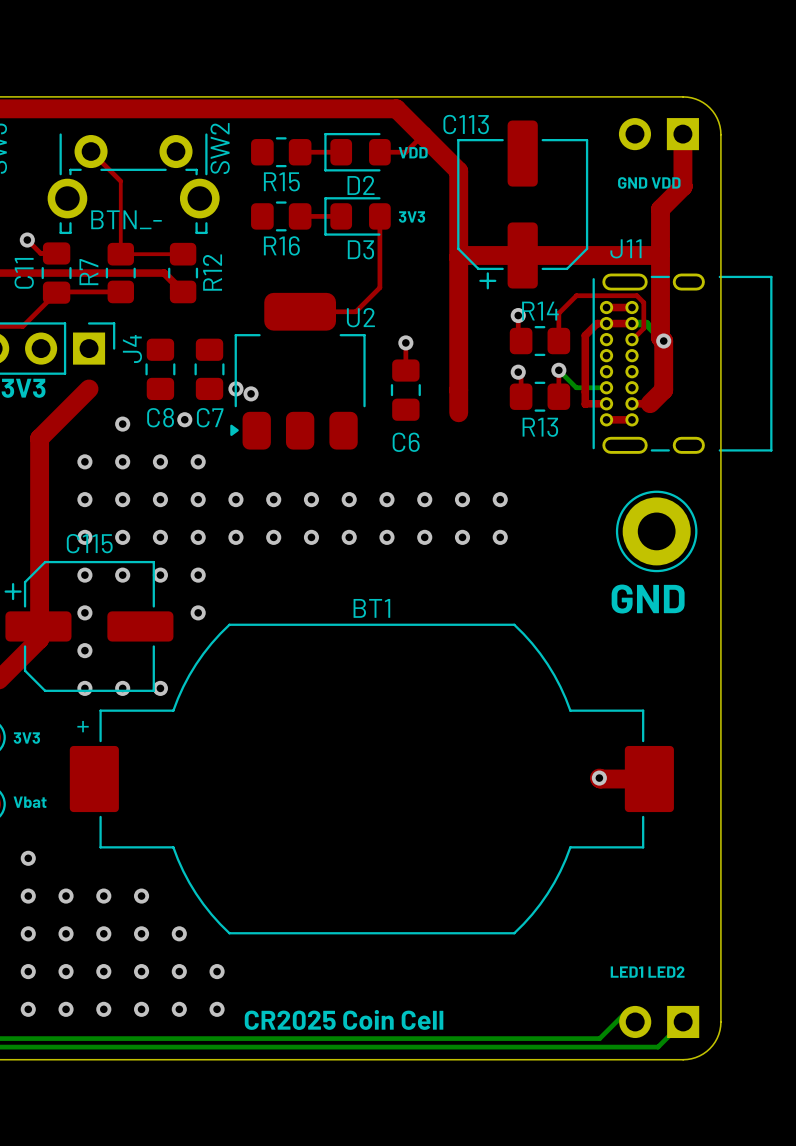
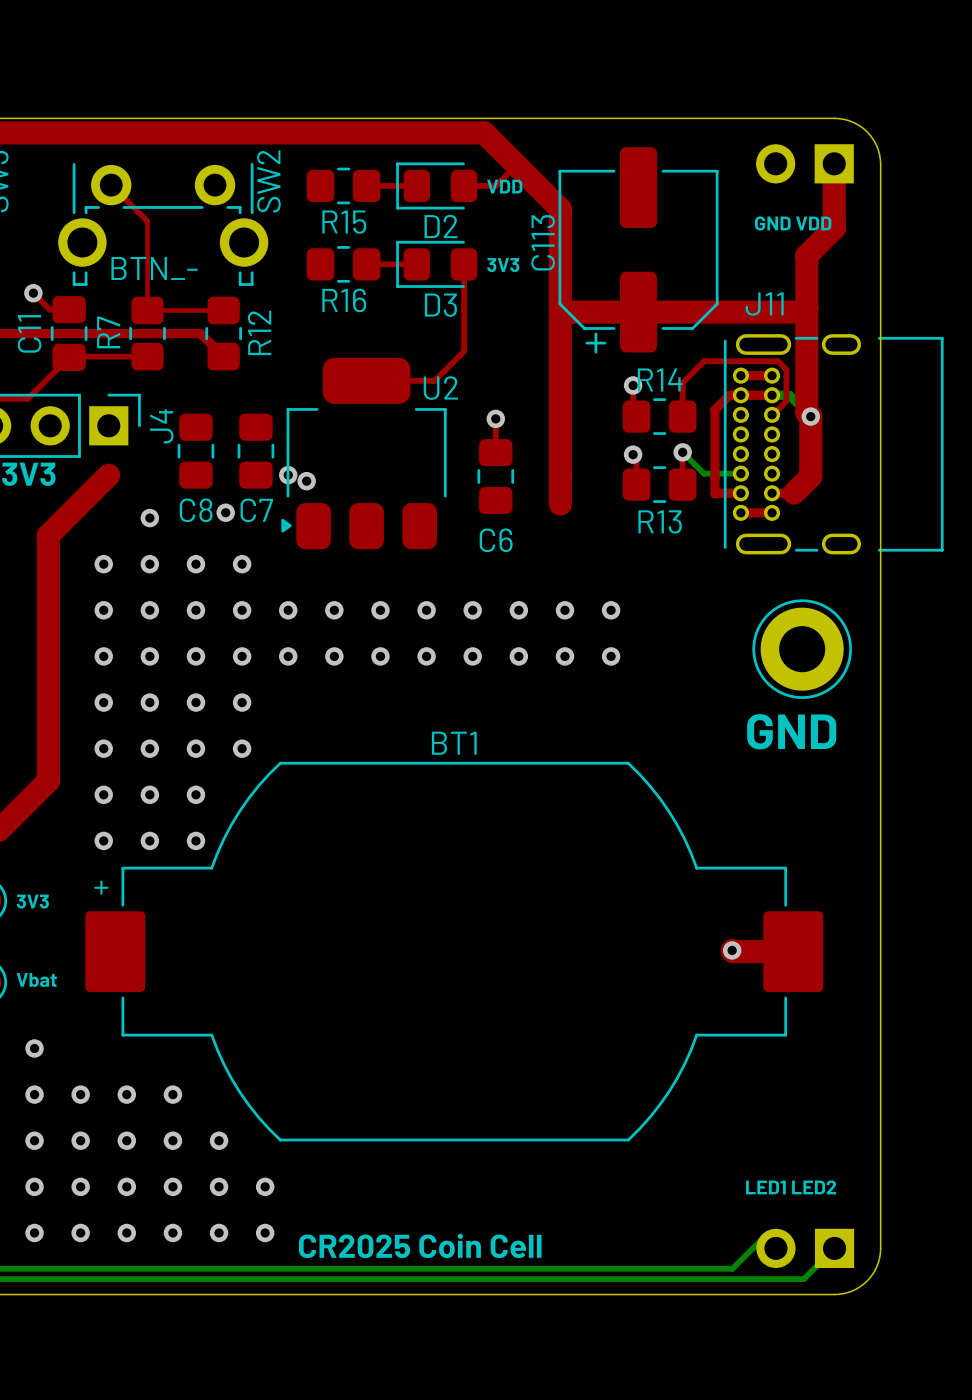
C113 name rotation: 0° (466, 124) -> 90° counterclockwise (543, 242)
via: none -> (149, 748)
via: none -> (195, 748)
C115: (88, 626) -> none
via: none -> (149, 794)
via: none -> (195, 794)

